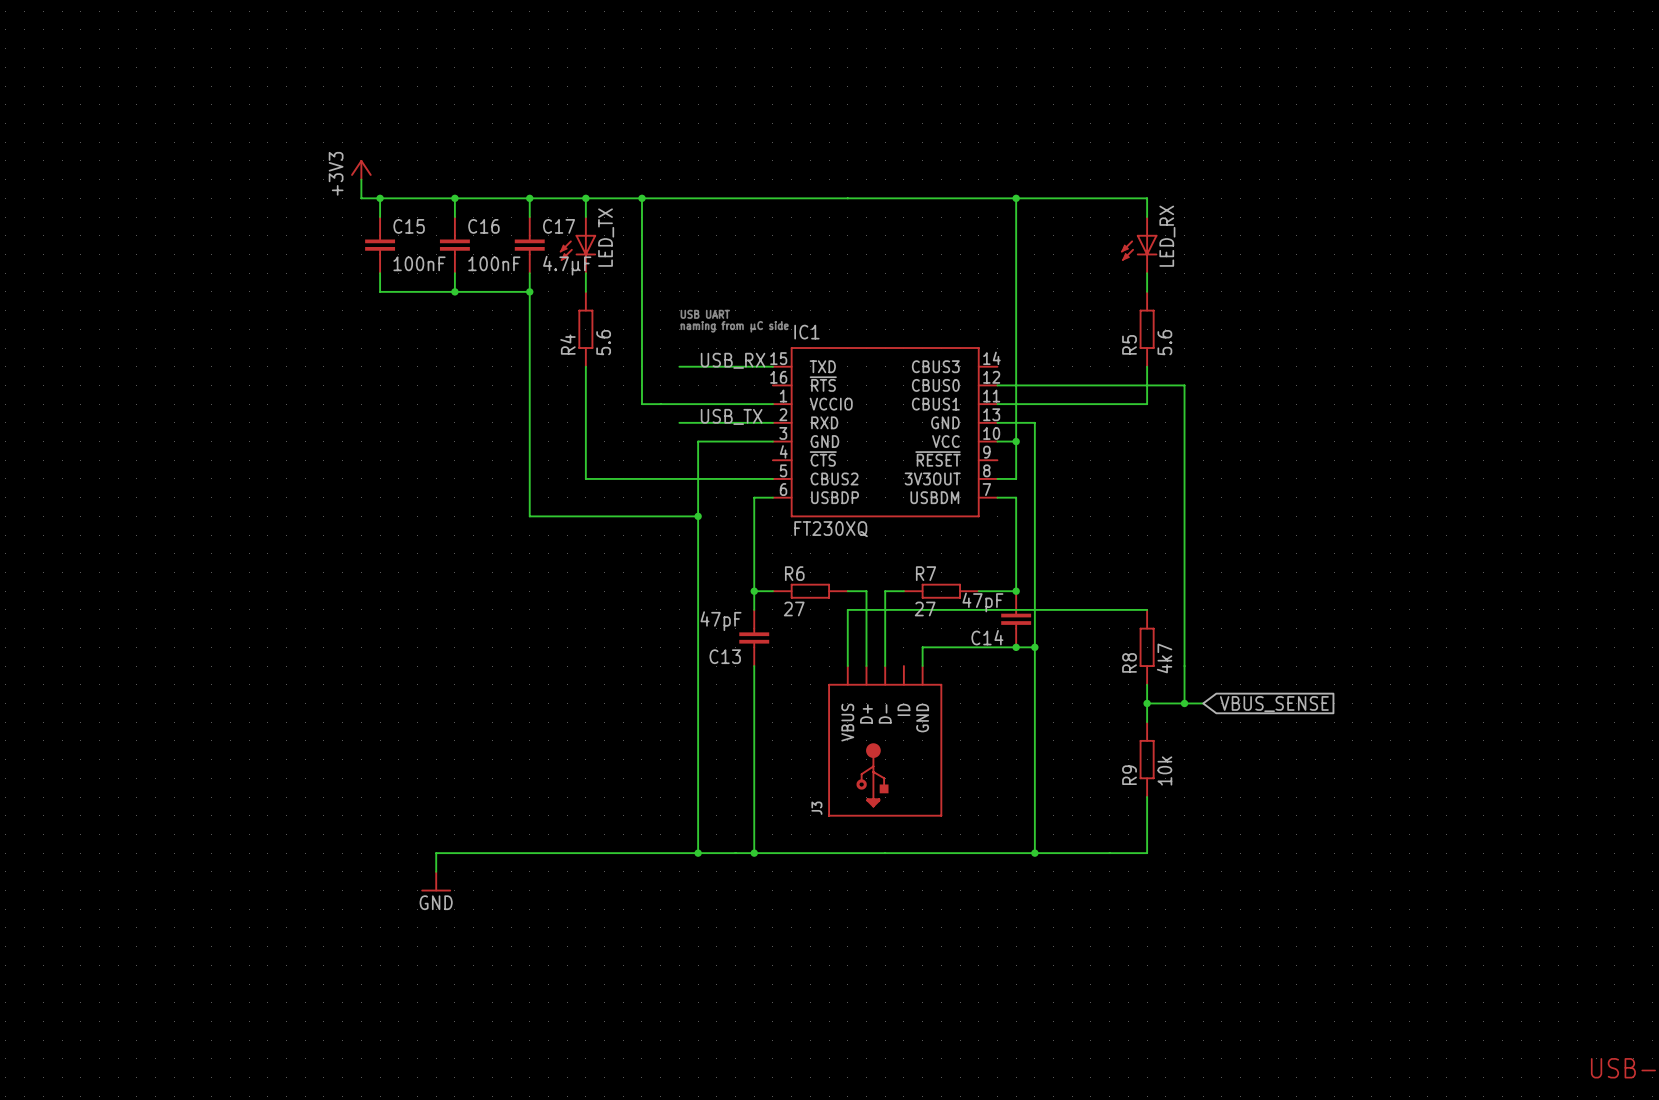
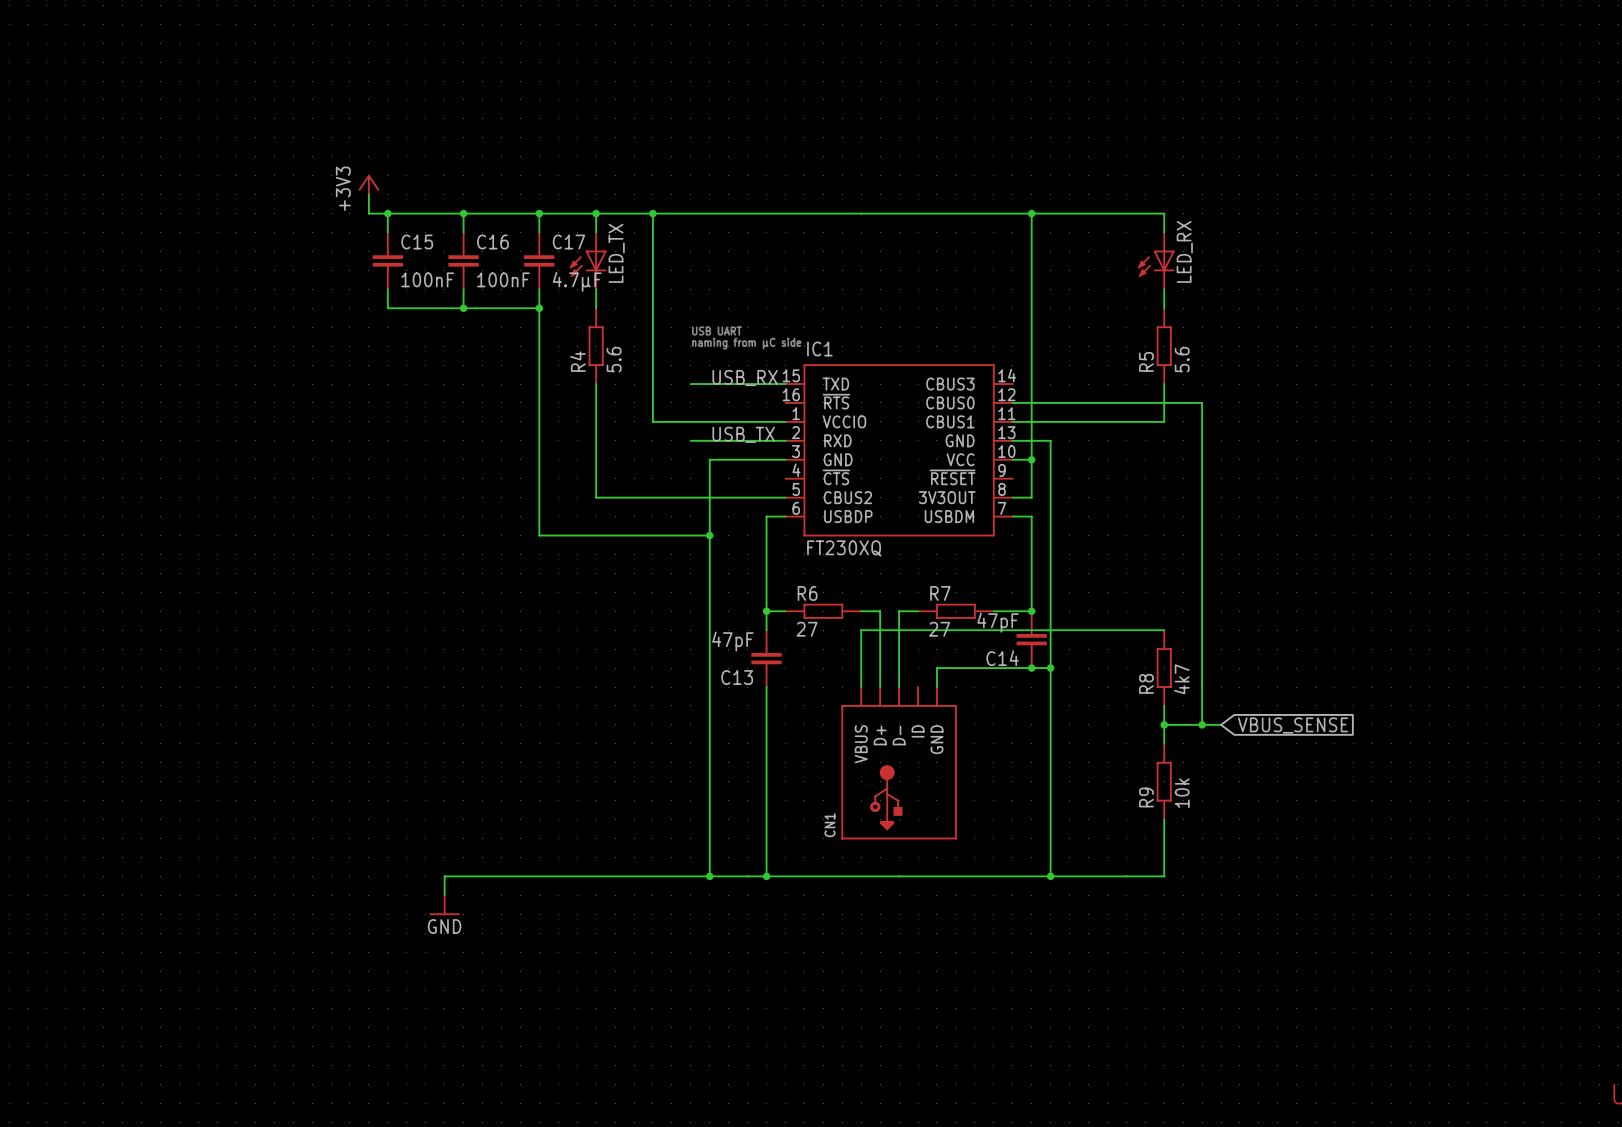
J3 name: J3 (816, 808) -> CN1 (829, 825)

